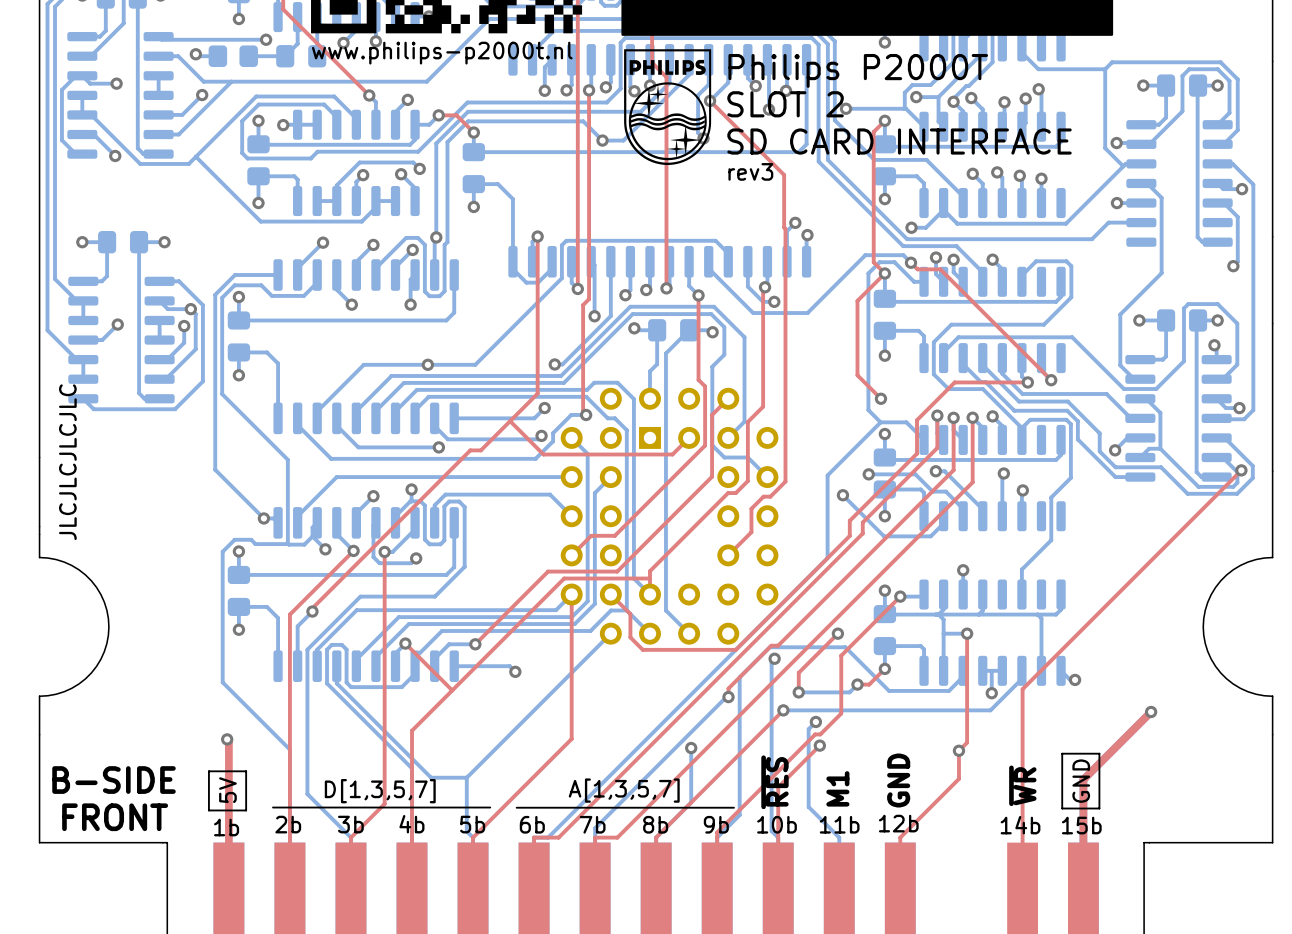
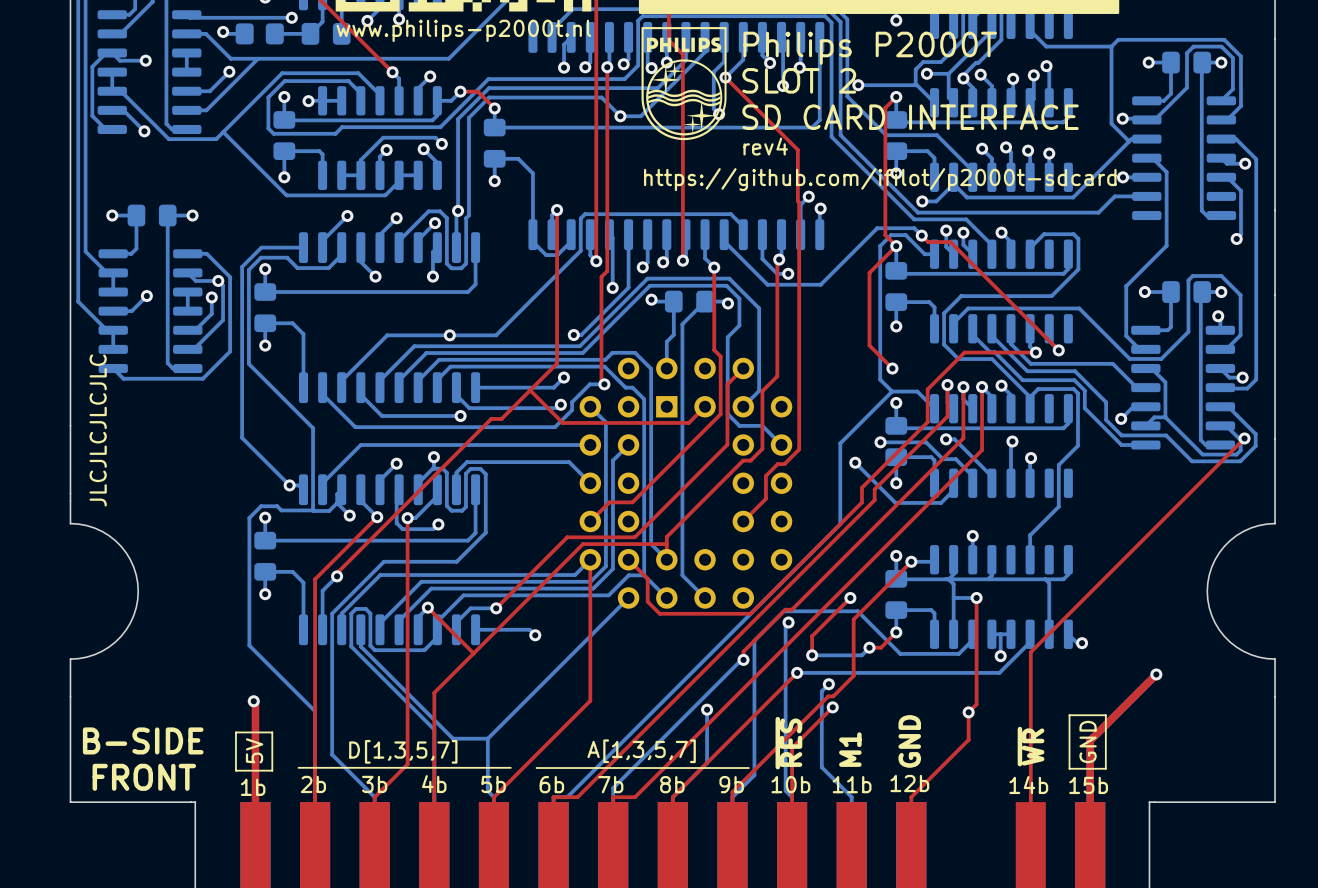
text: rev3 (750, 171) -> rev4 (765, 146)
text: none -> https://github.com/ifilot/p2000t-sdcard (880, 179)

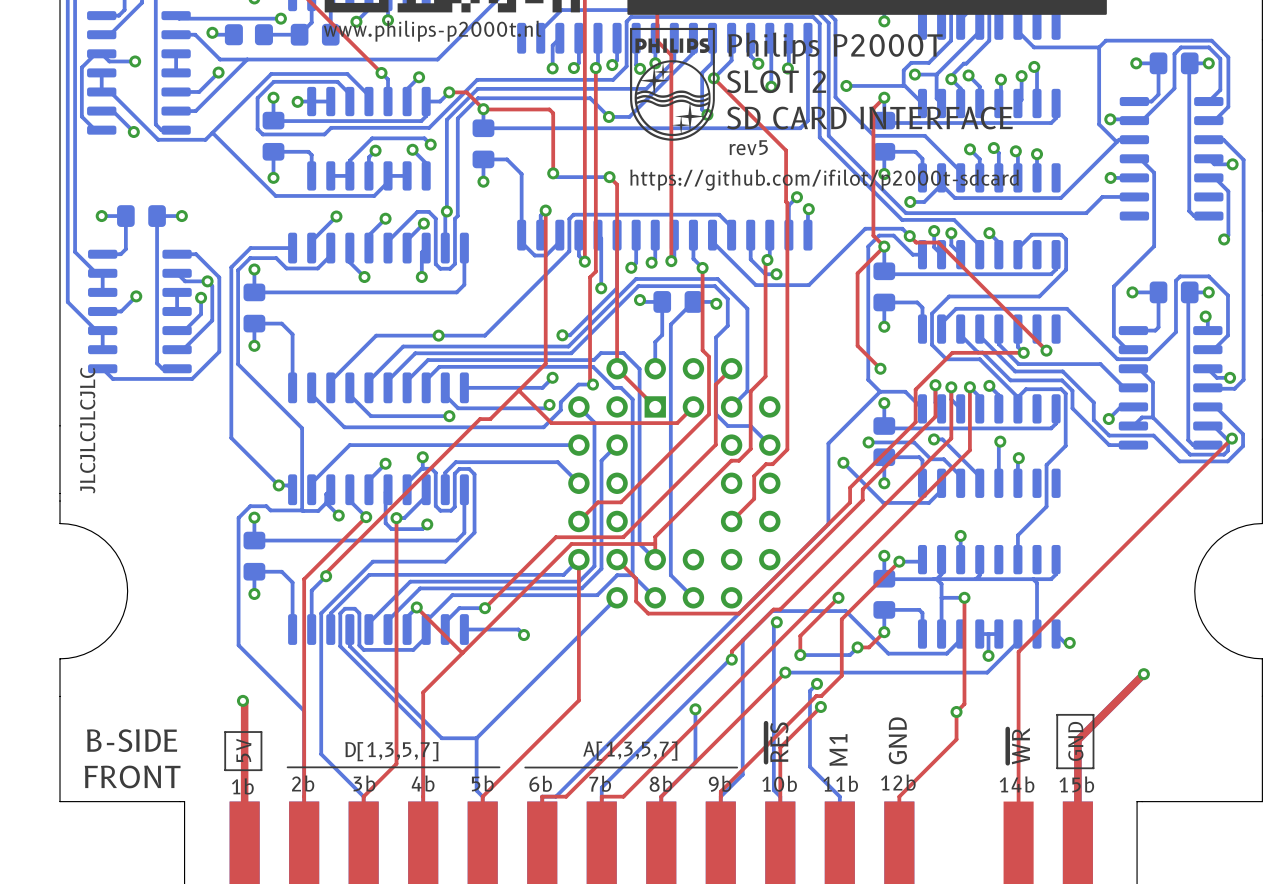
top track: none -> (483, 109) (549, 109) (553, 113) (553, 173)
text: rev4 (765, 146) -> rev5 (748, 147)
bottom track: none -> (553, 173) (556, 177) (609, 177)
via: none -> (553, 173)
top track: none -> (609, 177) (617, 184) (617, 368) (655, 406)
via: none -> (609, 177)

